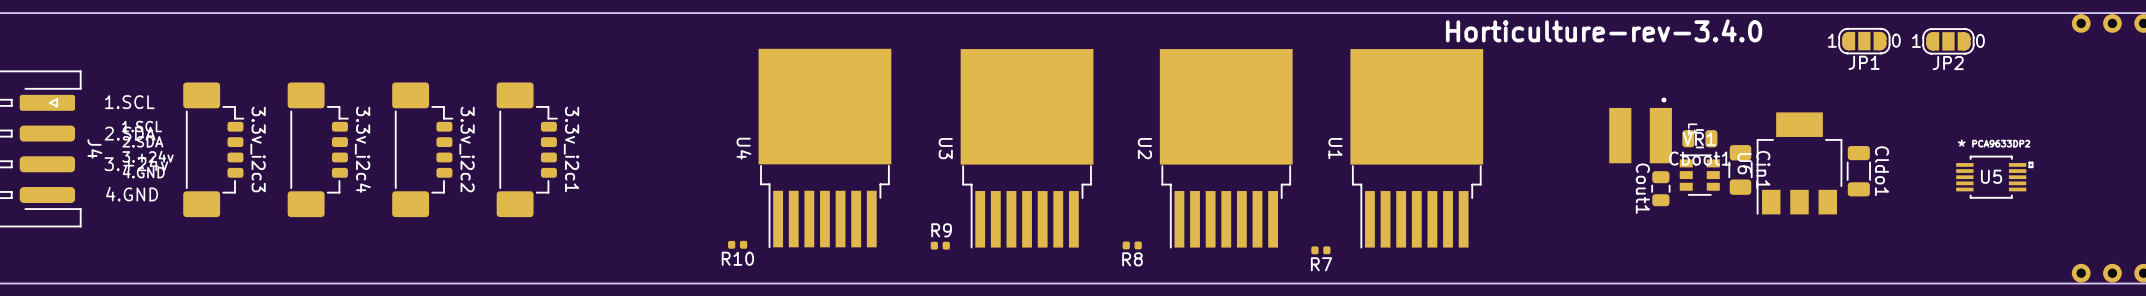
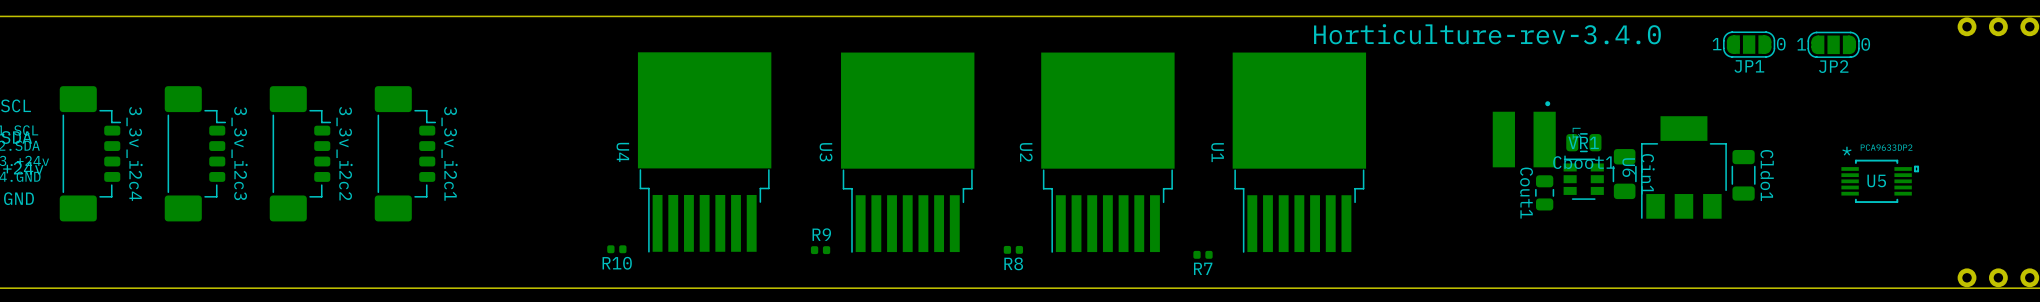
3.3v_i2c3 name: 3.3v_i2c3 (258, 149) -> 3_3v_i2c4 (134, 153)
3.3v_i2c4 name: 3.3v_i2c4 (362, 149) -> 3_3v_i2c3 (239, 153)
3.3v_i2c2 name: 3.3v_i2c2 (467, 149) -> 3_3v_i2c2 (344, 153)
3.3v_i2c1 name: 3.3v_i2c1 (571, 149) -> 3_3v_i2c1 (449, 153)

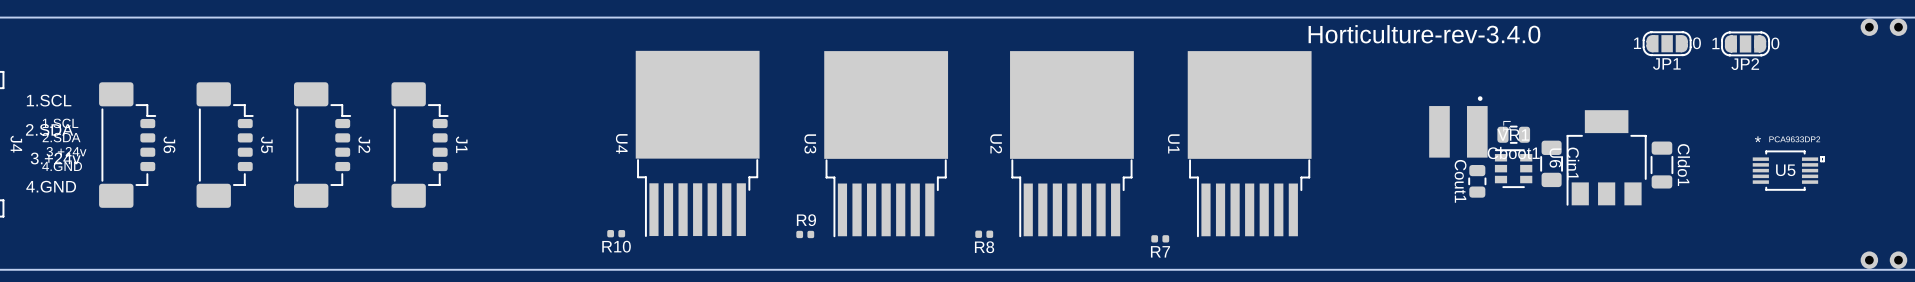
3_3v_i2c4 name: 3_3v_i2c4 (134, 153) -> J6 (169, 144)
3_3v_i2c3 name: 3_3v_i2c3 (239, 153) -> J5 (266, 144)
3_3v_i2c2 name: 3_3v_i2c2 (344, 153) -> J2 (364, 144)
3_3v_i2c1 name: 3_3v_i2c1 (449, 153) -> J1 (461, 144)

